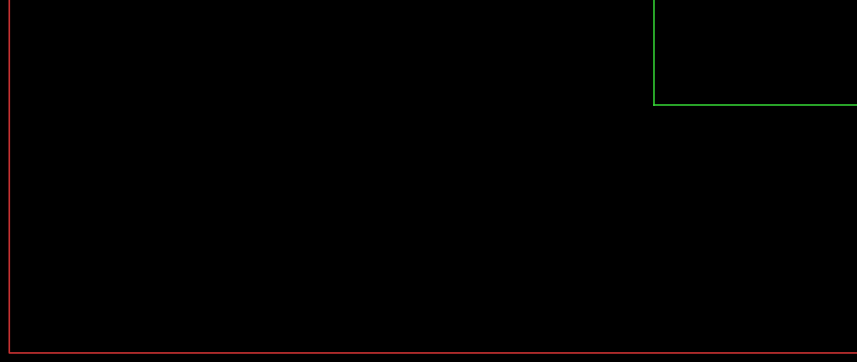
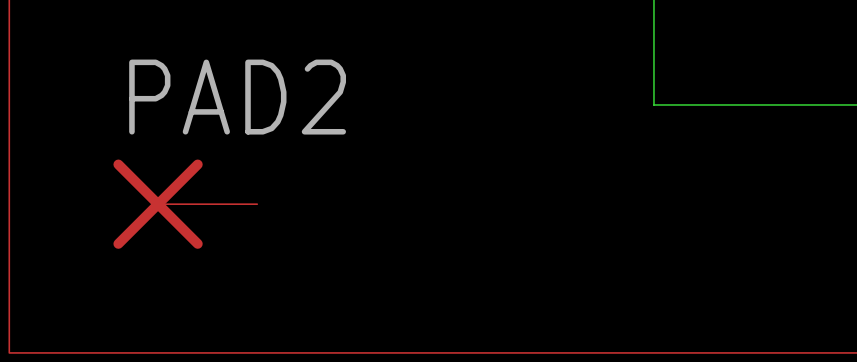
PAD2: none -> (185, 204)

